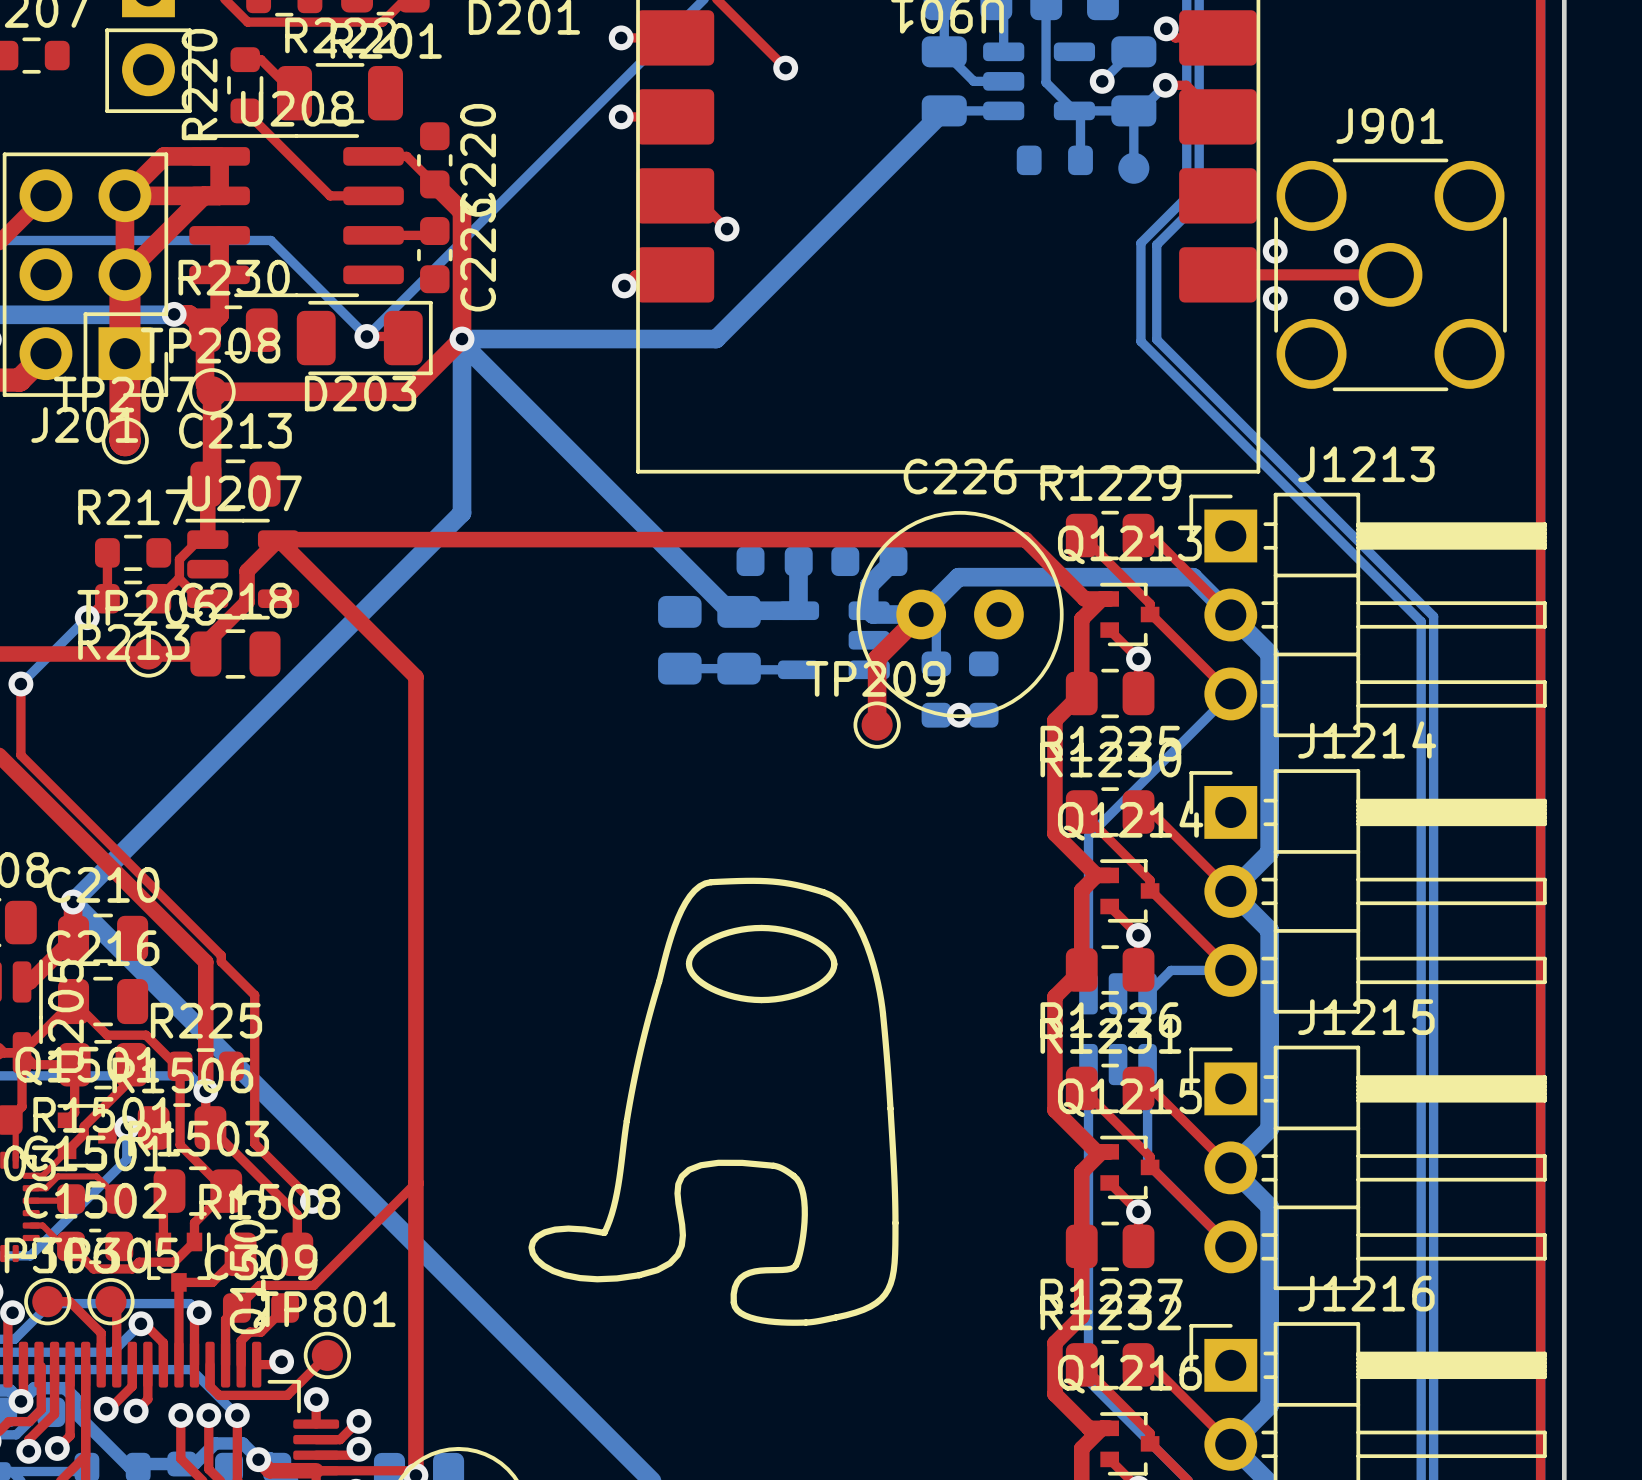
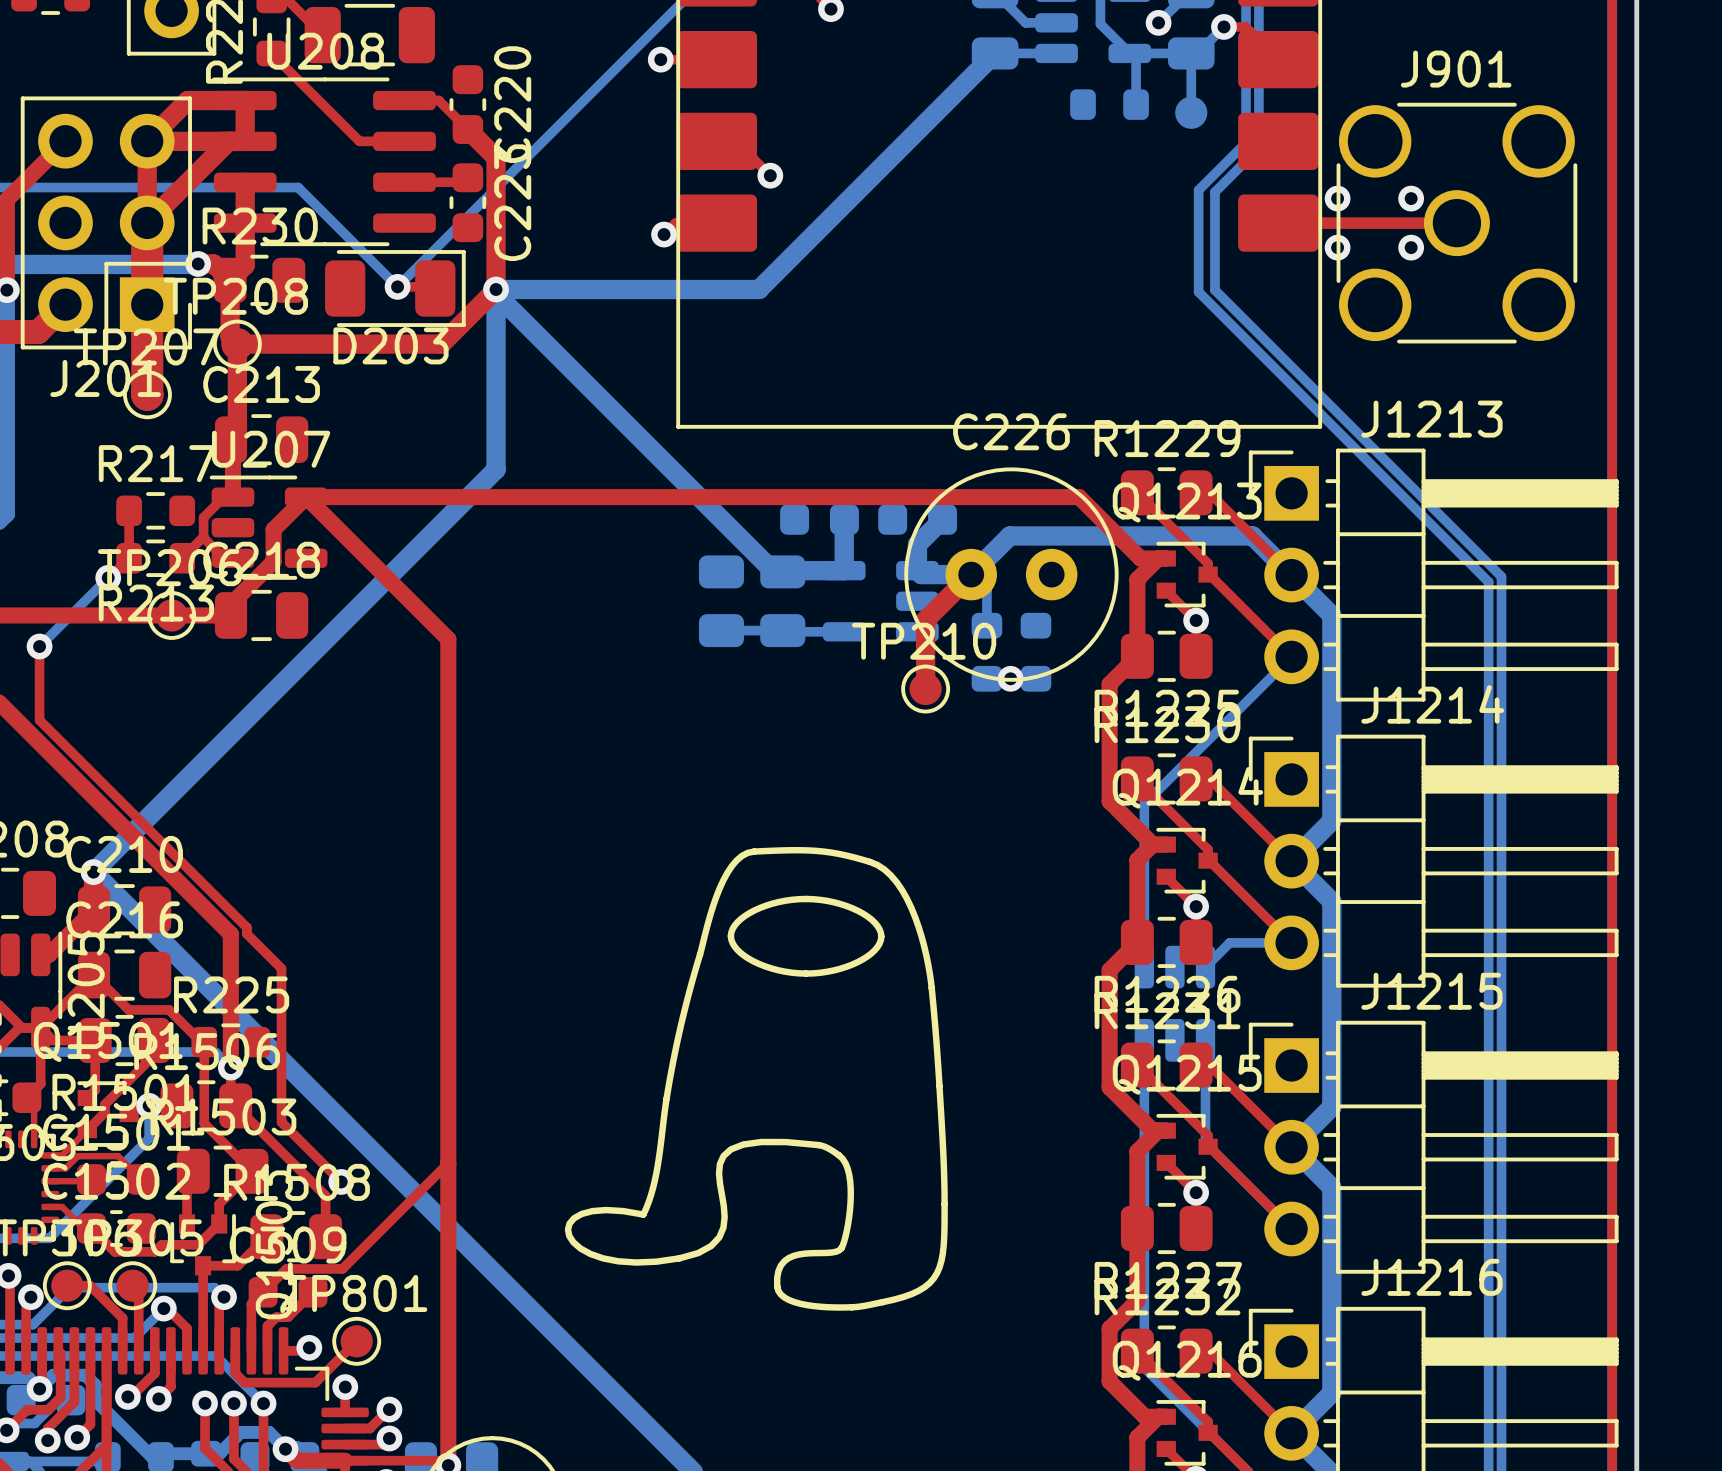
TP209 name: TP209 (875, 678) -> TP210 (924, 641)

